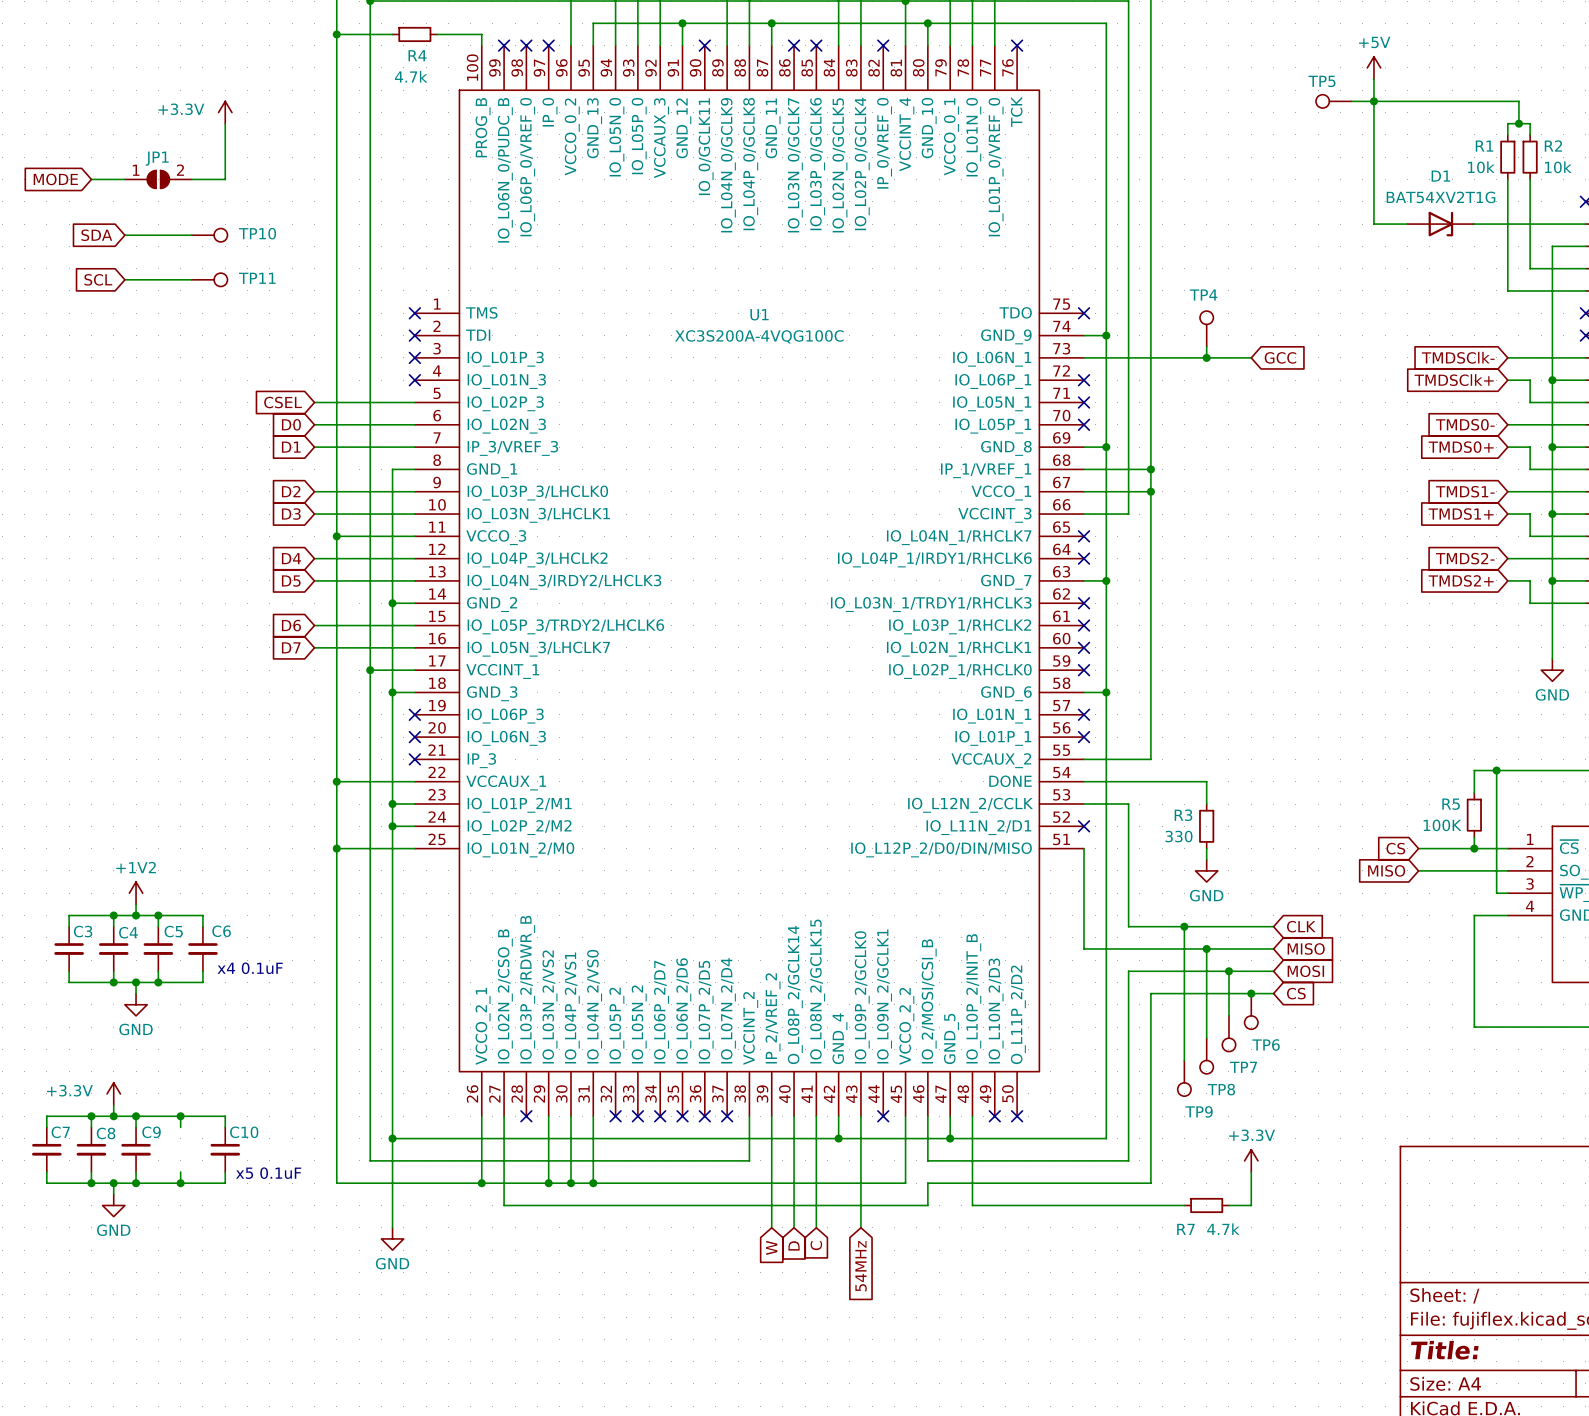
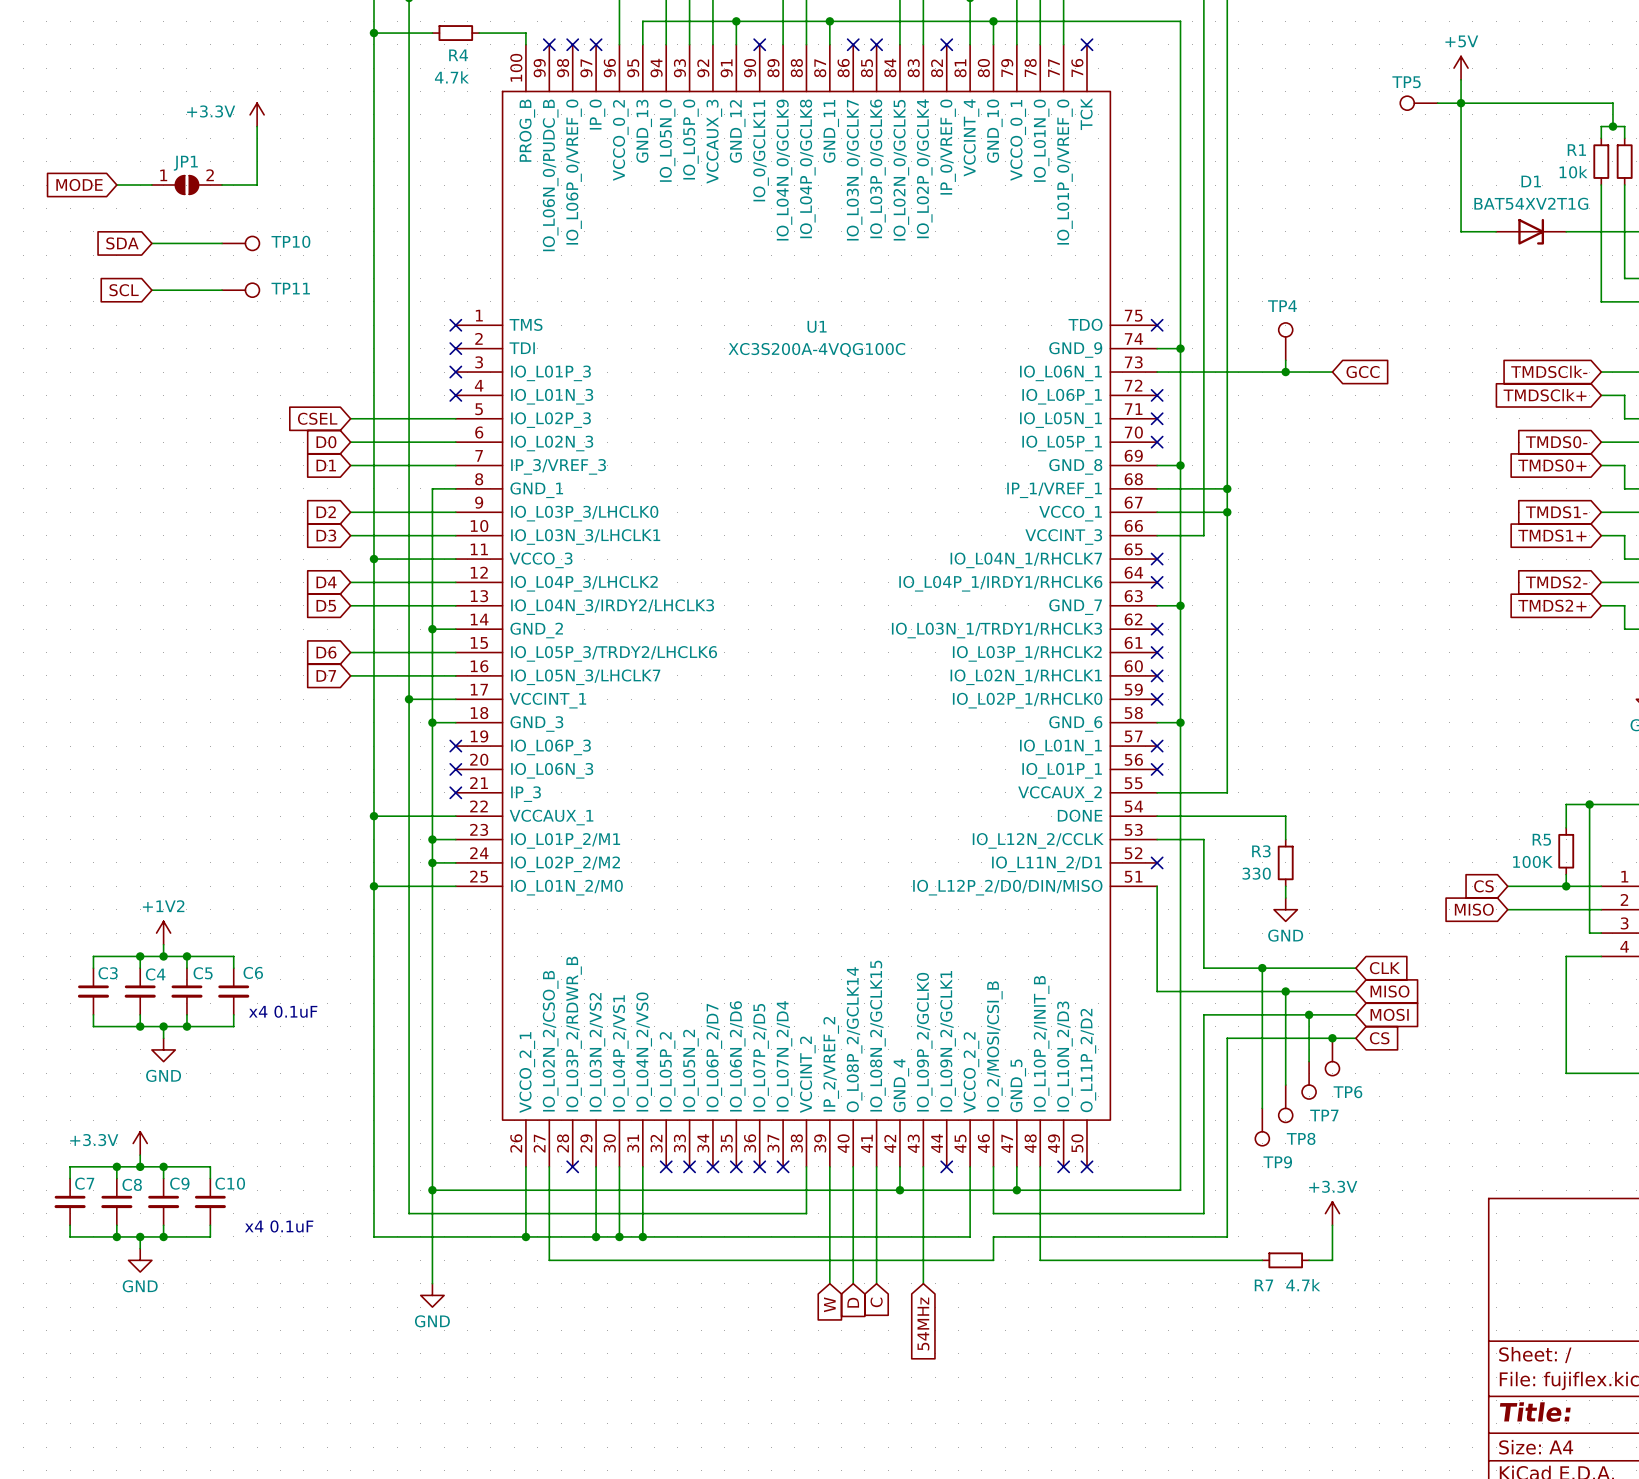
wire: (180, 1116) (225, 1116) (225, 1127) -> none
junction: (180, 1116) -> none
C10 position: (225, 1149) -> (210, 1201)
wire: (225, 1172) (225, 1183) (180, 1183) -> none
text: x5 0.1uF (268, 1173) -> x4 0.1uF (279, 1226)
junction: (180, 1183) -> none

